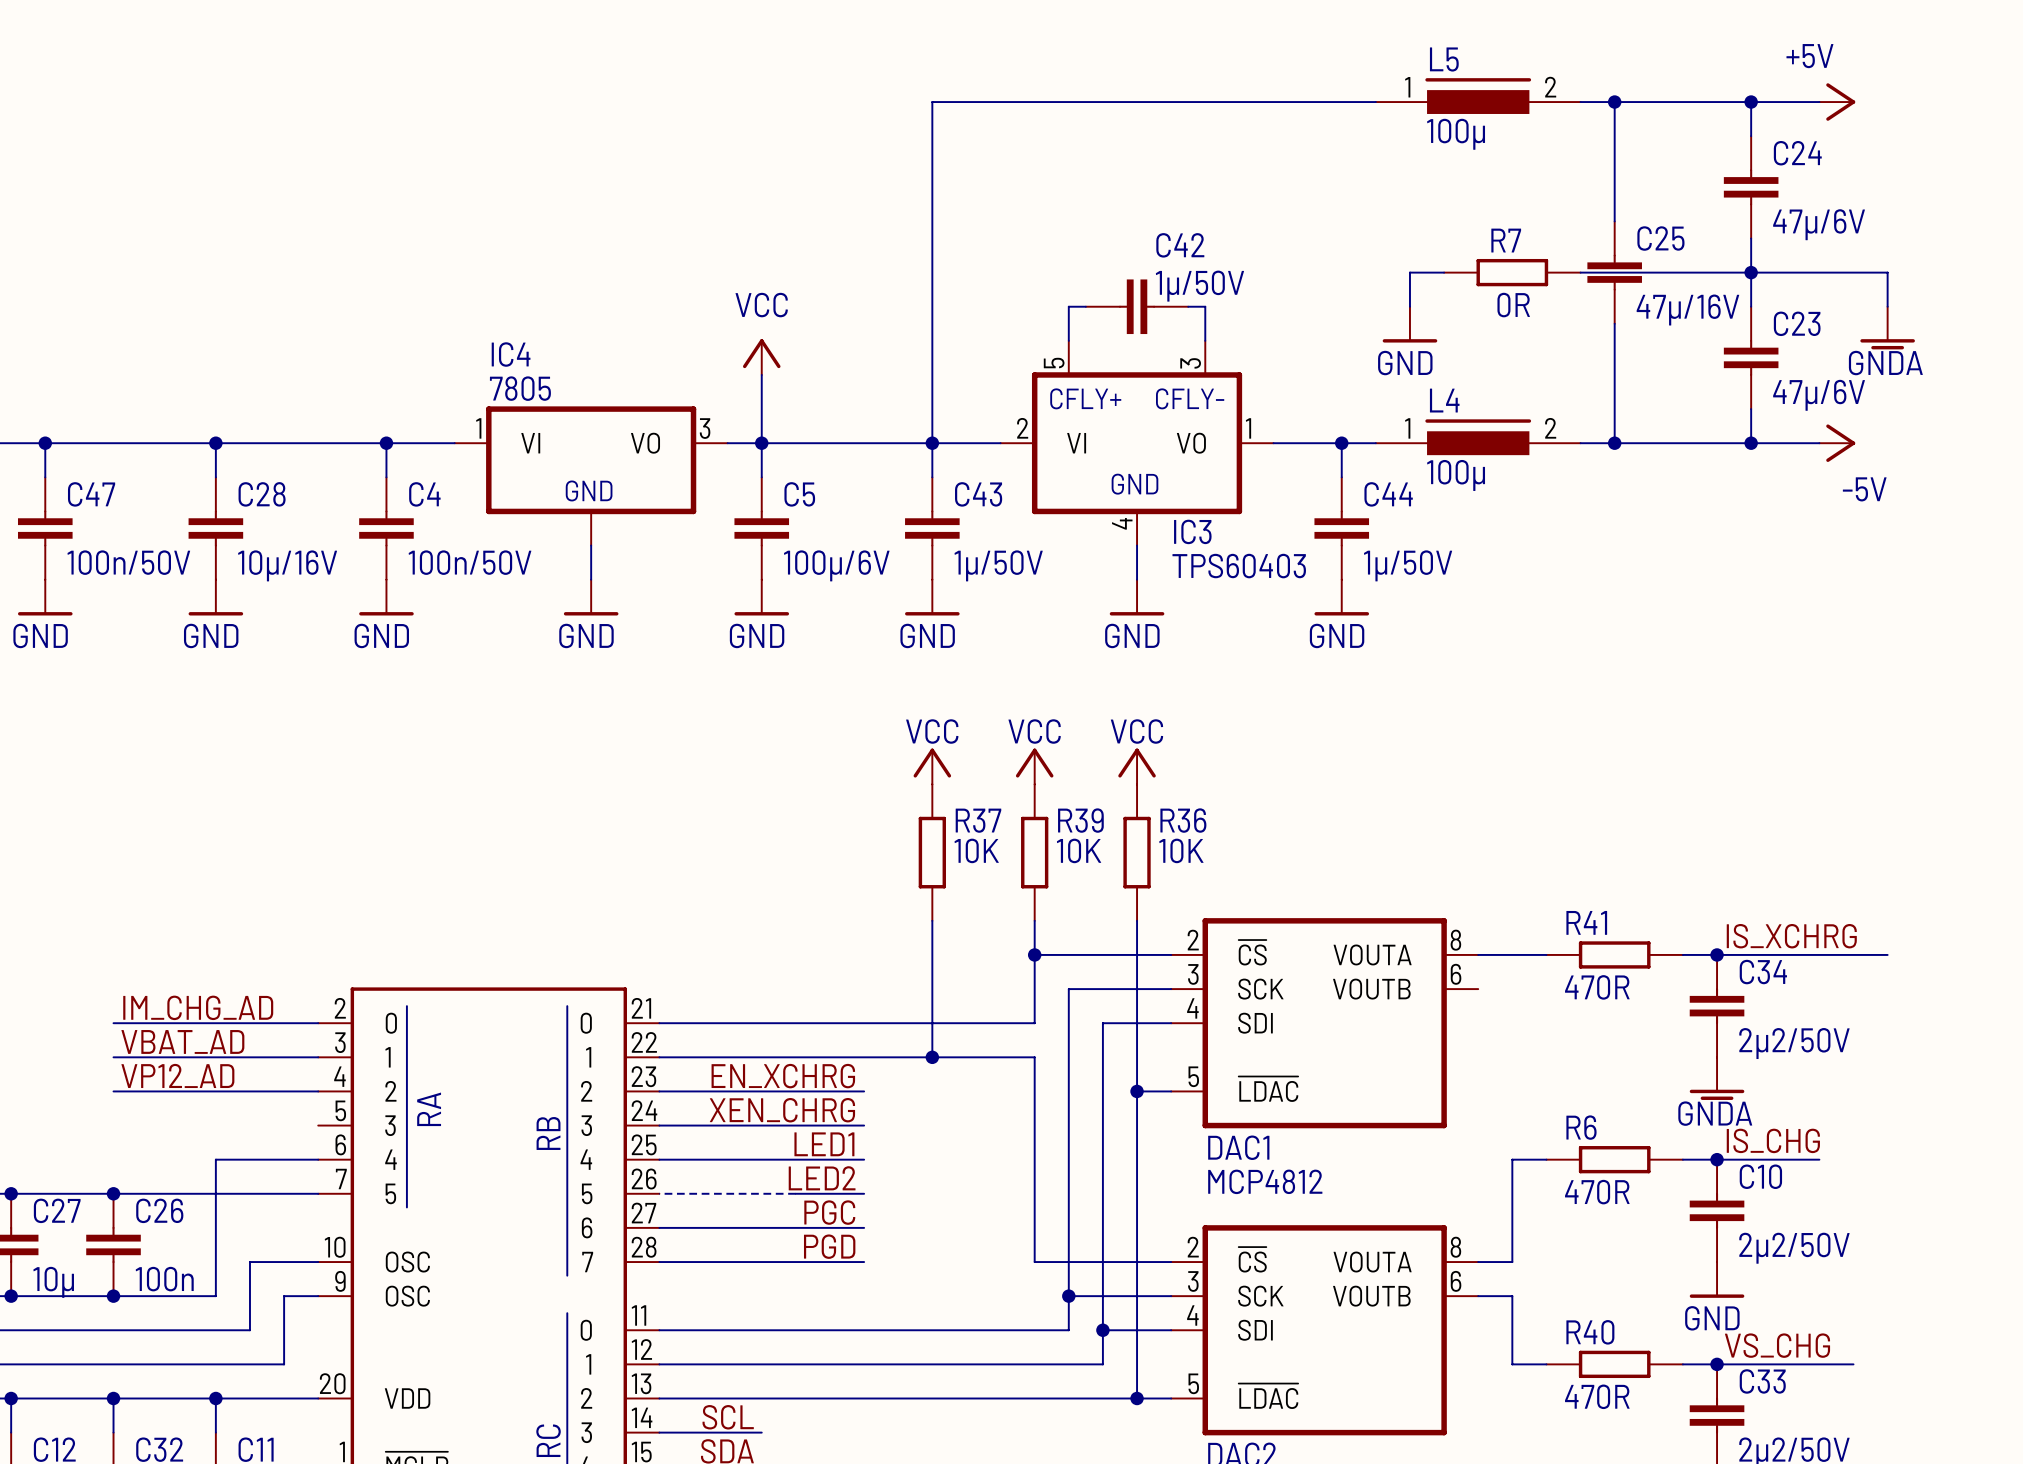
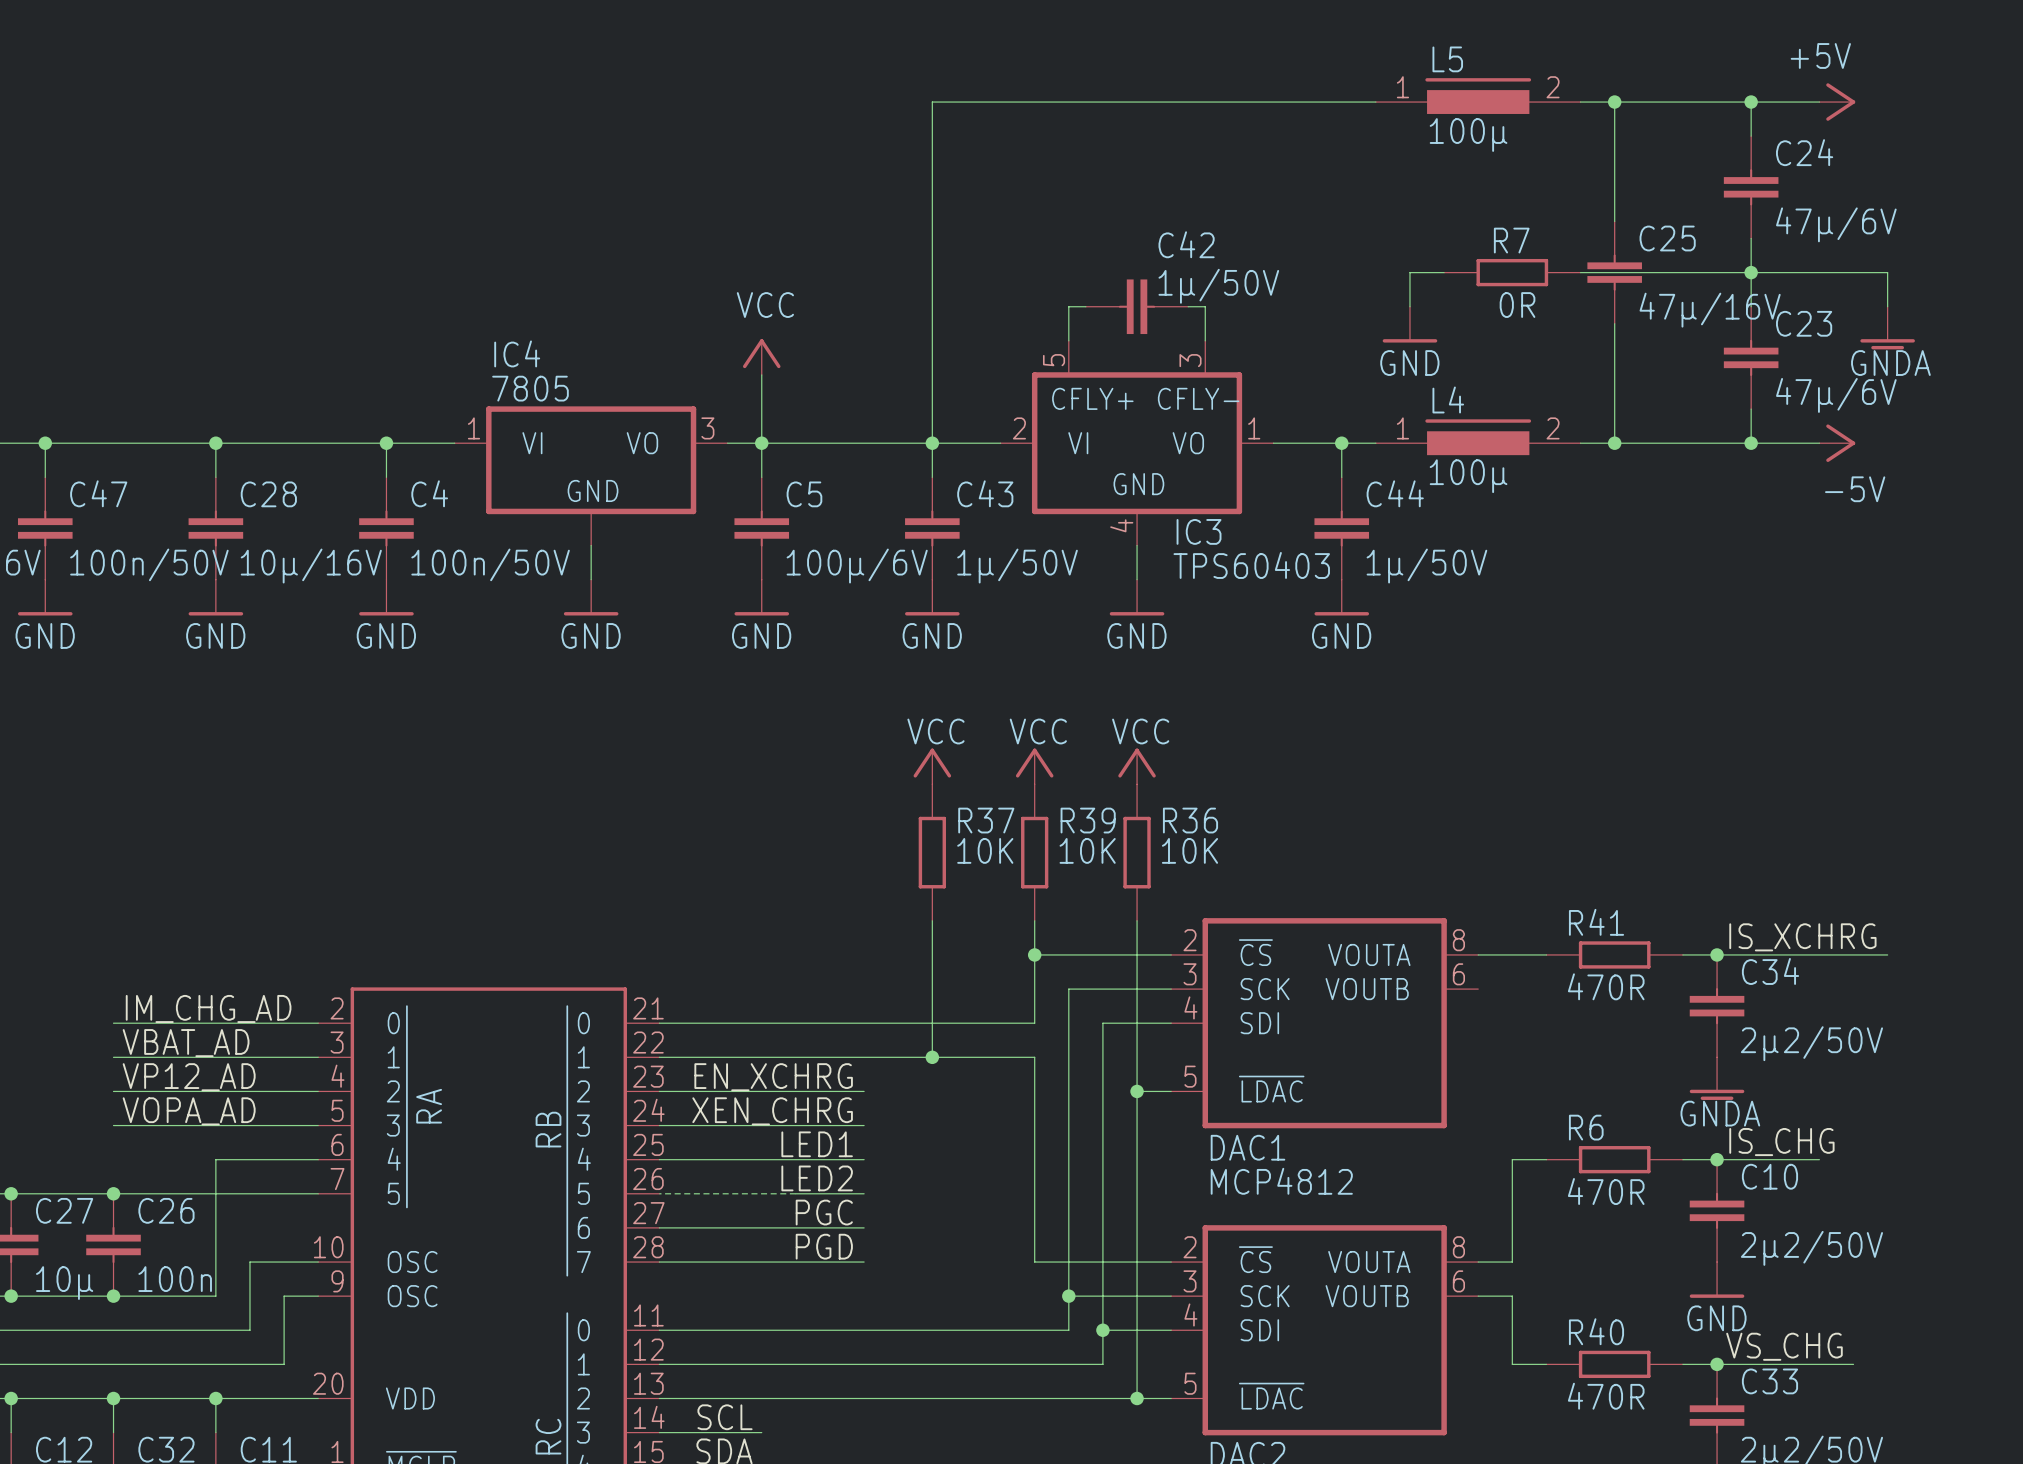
label: none -> VOPA_AD (189, 1111)
wire: none -> (113, 1125) (318, 1125)

